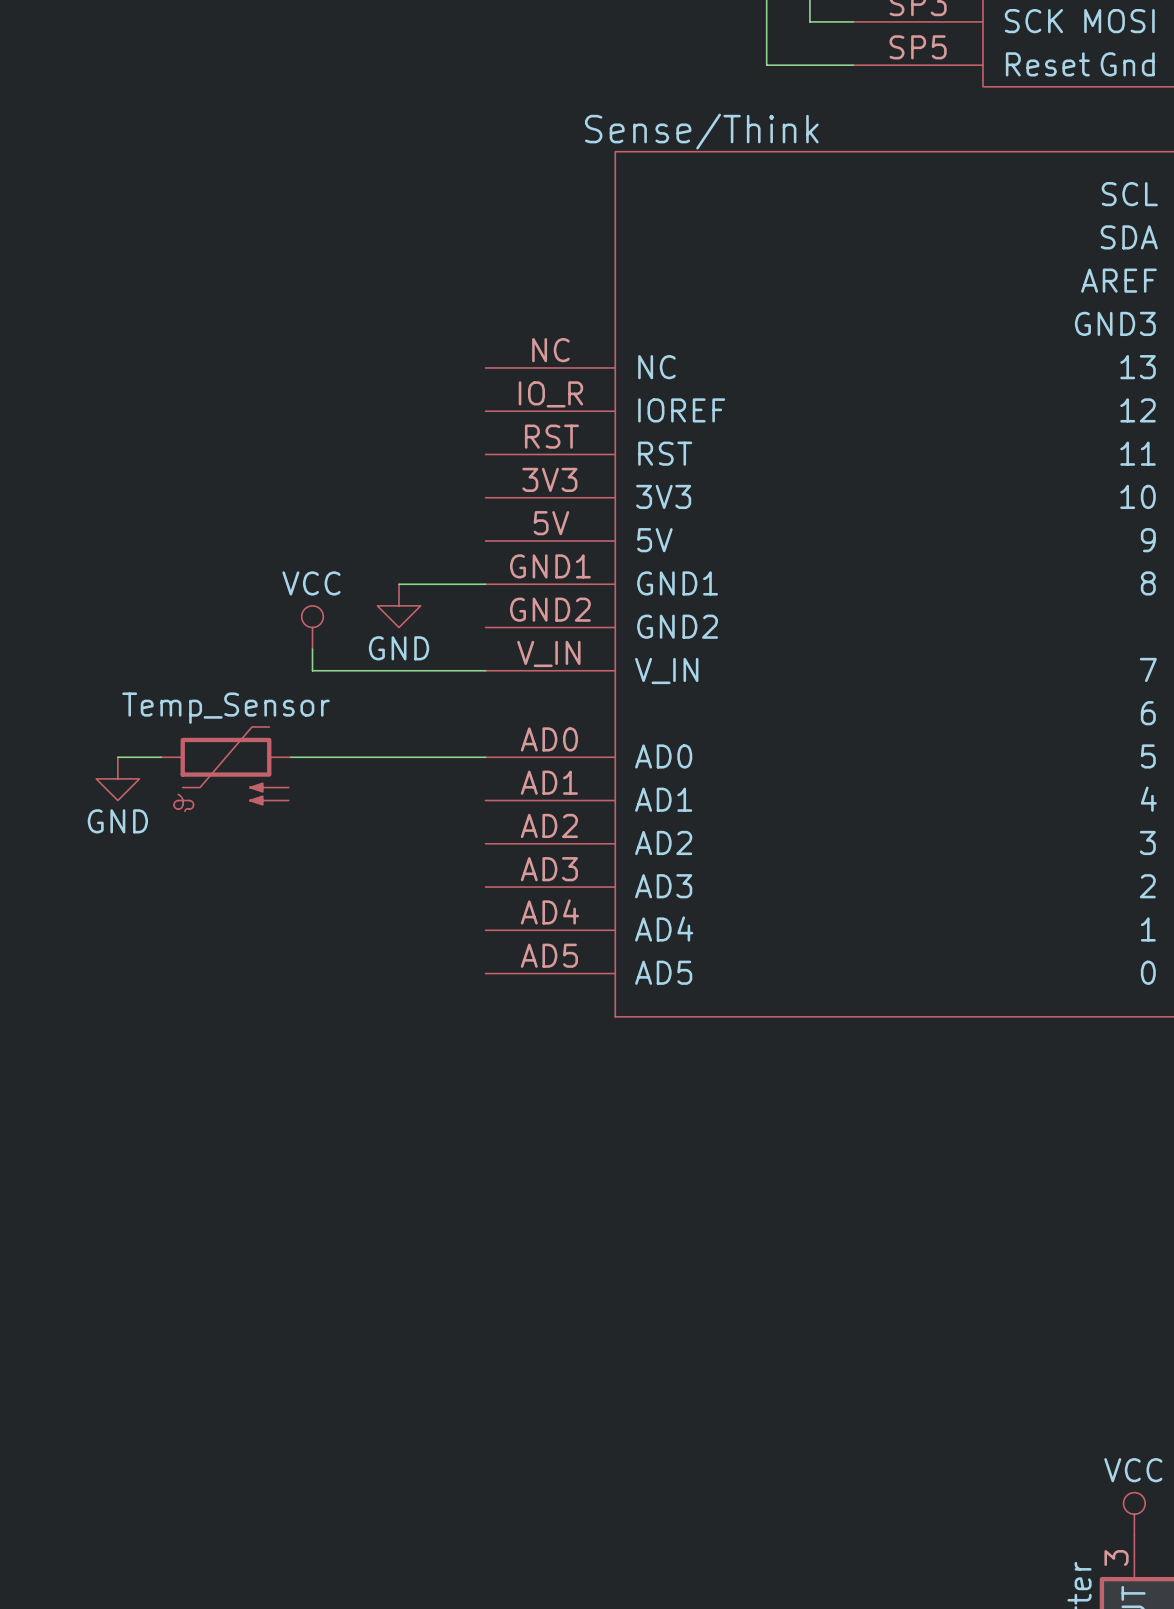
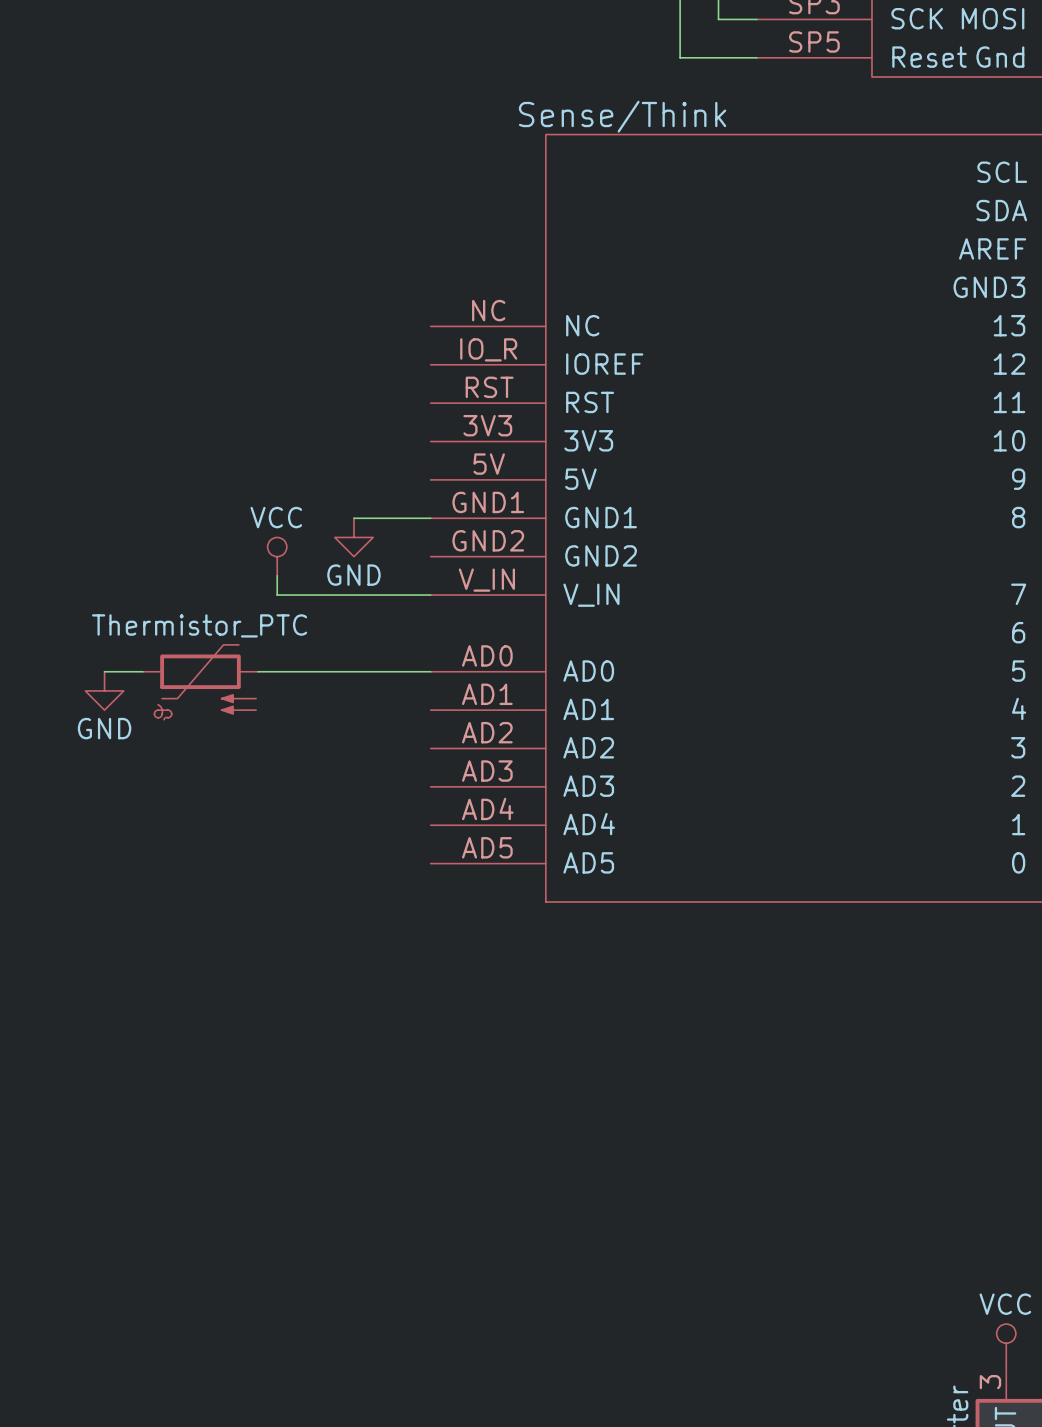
part value: Temp_Sensor (226, 708) -> Thermistor_PTC (199, 625)

